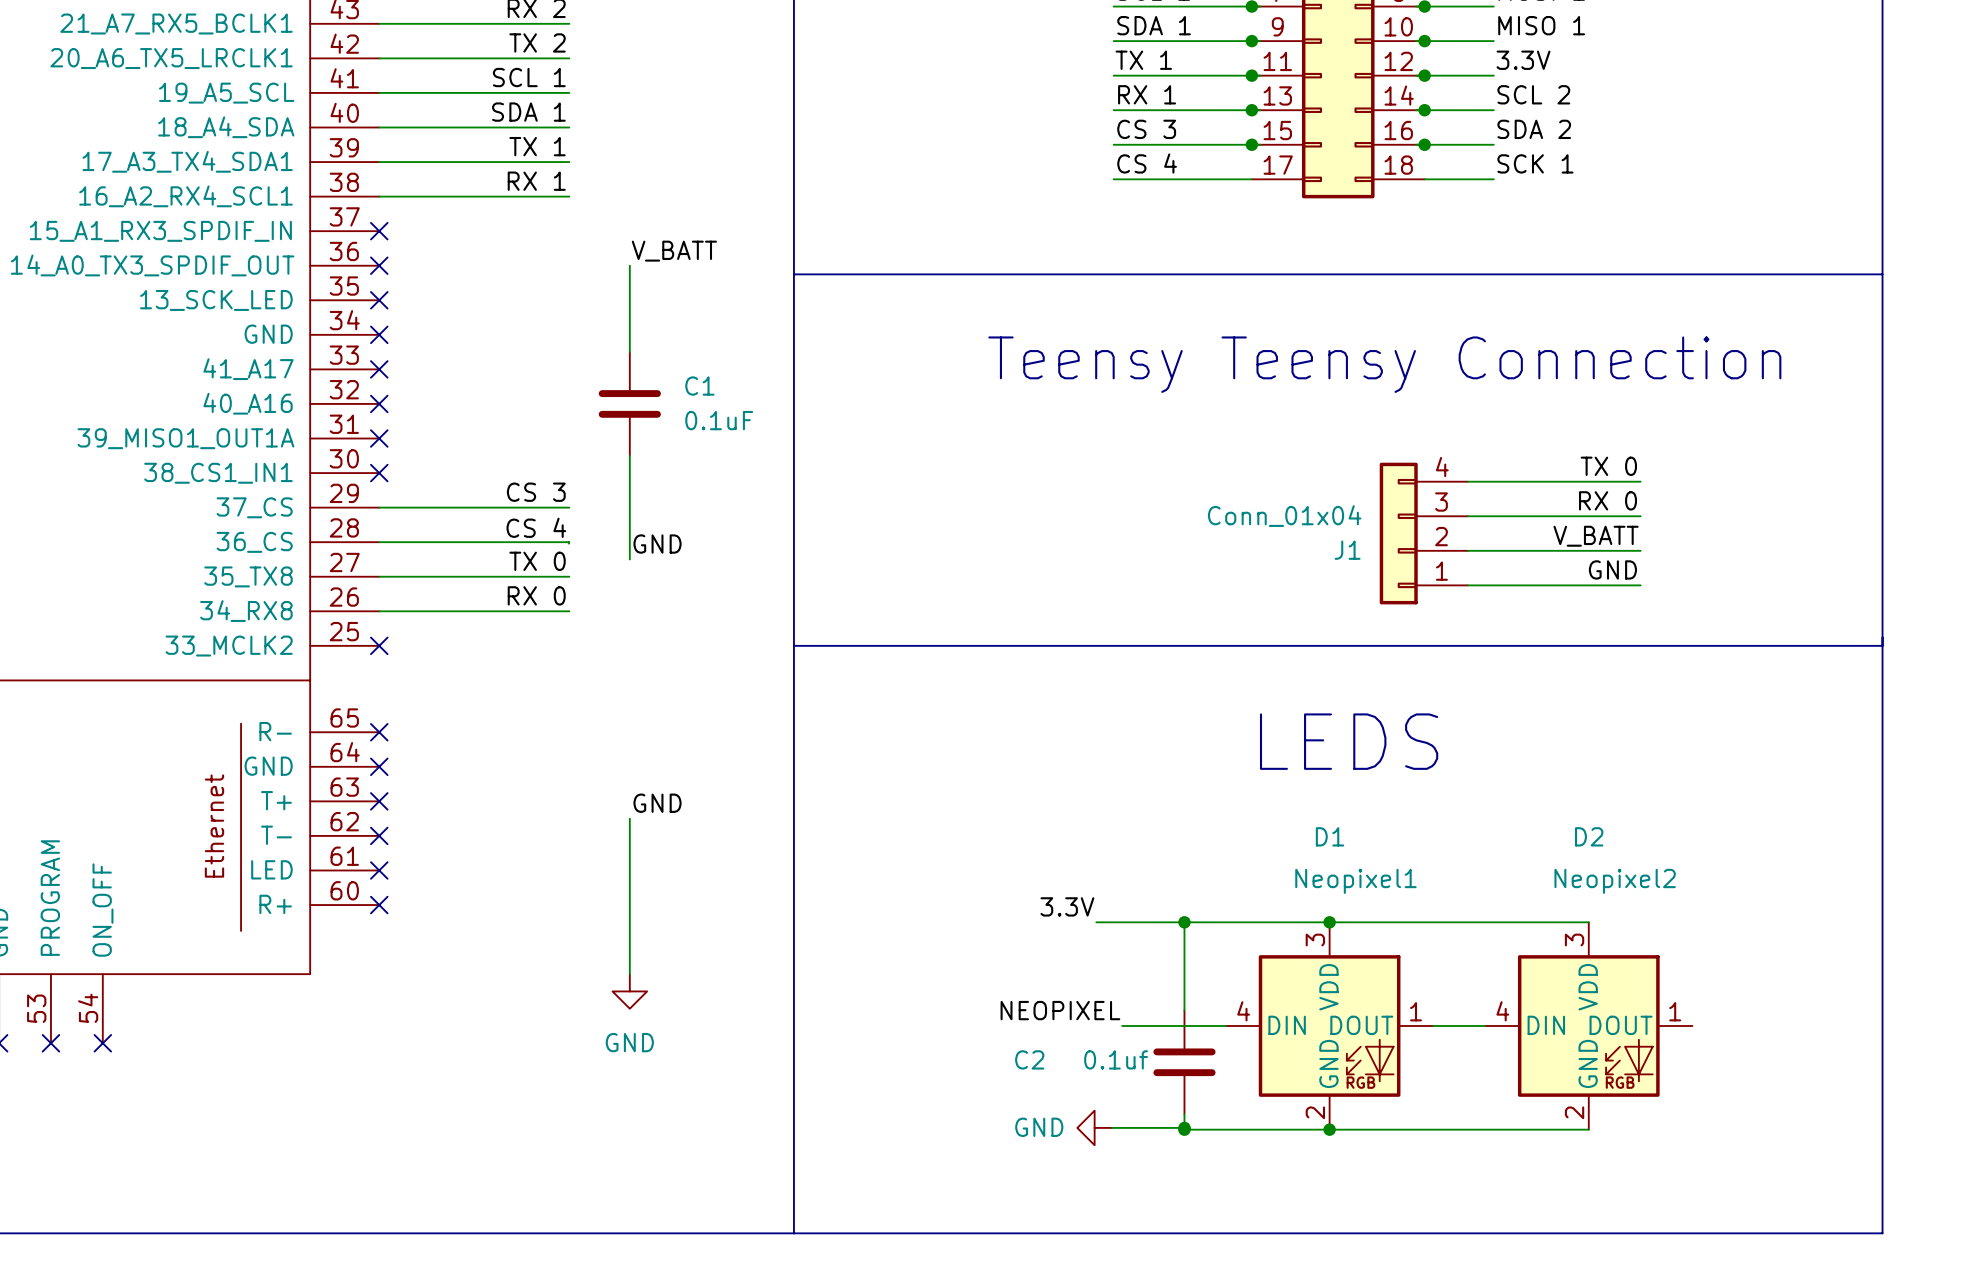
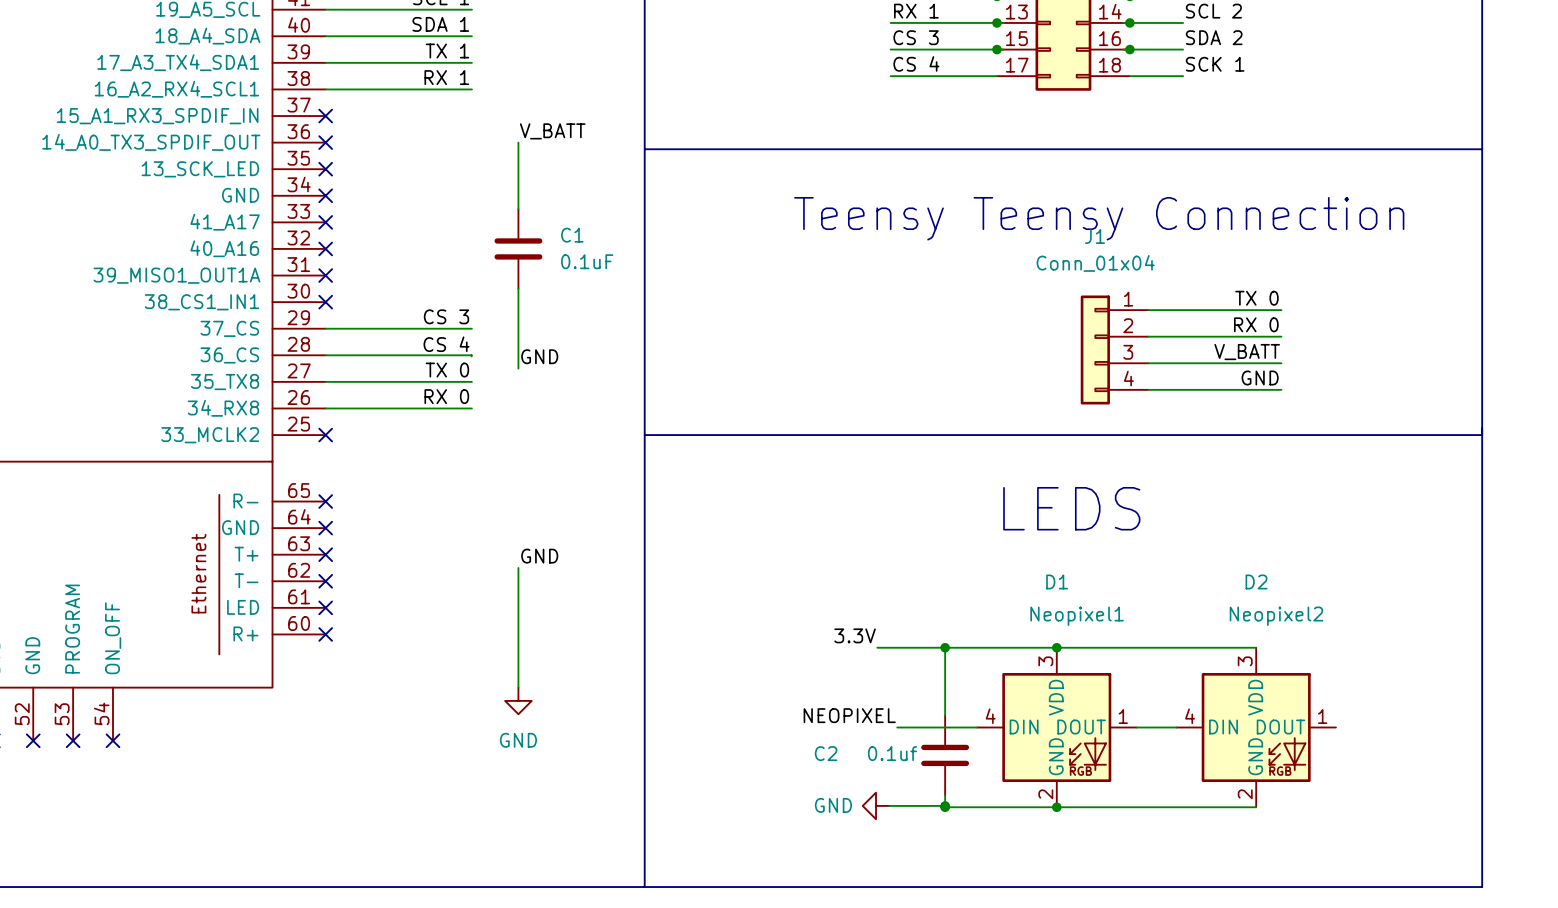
label position: TX 0 (1608, 466) -> TX 0 (1256, 298)
wire: (1467, 481) (1640, 481) -> (1148, 310) (1281, 310)
label position: RX 0 (1608, 500) -> RX 0 (1256, 324)
J1 value position: Conn_01x04 (1284, 516) -> Conn_01x04 (1095, 263)
wire: (1467, 516) (1640, 516) -> (1148, 336) (1281, 336)
J1 flip: as is (1398, 533) -> up-down (1095, 349)
label position: V_BATT (1596, 536) -> V_BATT (1247, 352)
J1 name position: J1 (1347, 550) -> J1 (1095, 236)
wire: (1467, 550) (1640, 550) -> (1148, 363) (1281, 363)
label position: GND (1612, 569) -> GND (1260, 378)
wire: (1467, 585) (1640, 585) -> (1148, 389) (1281, 389)

